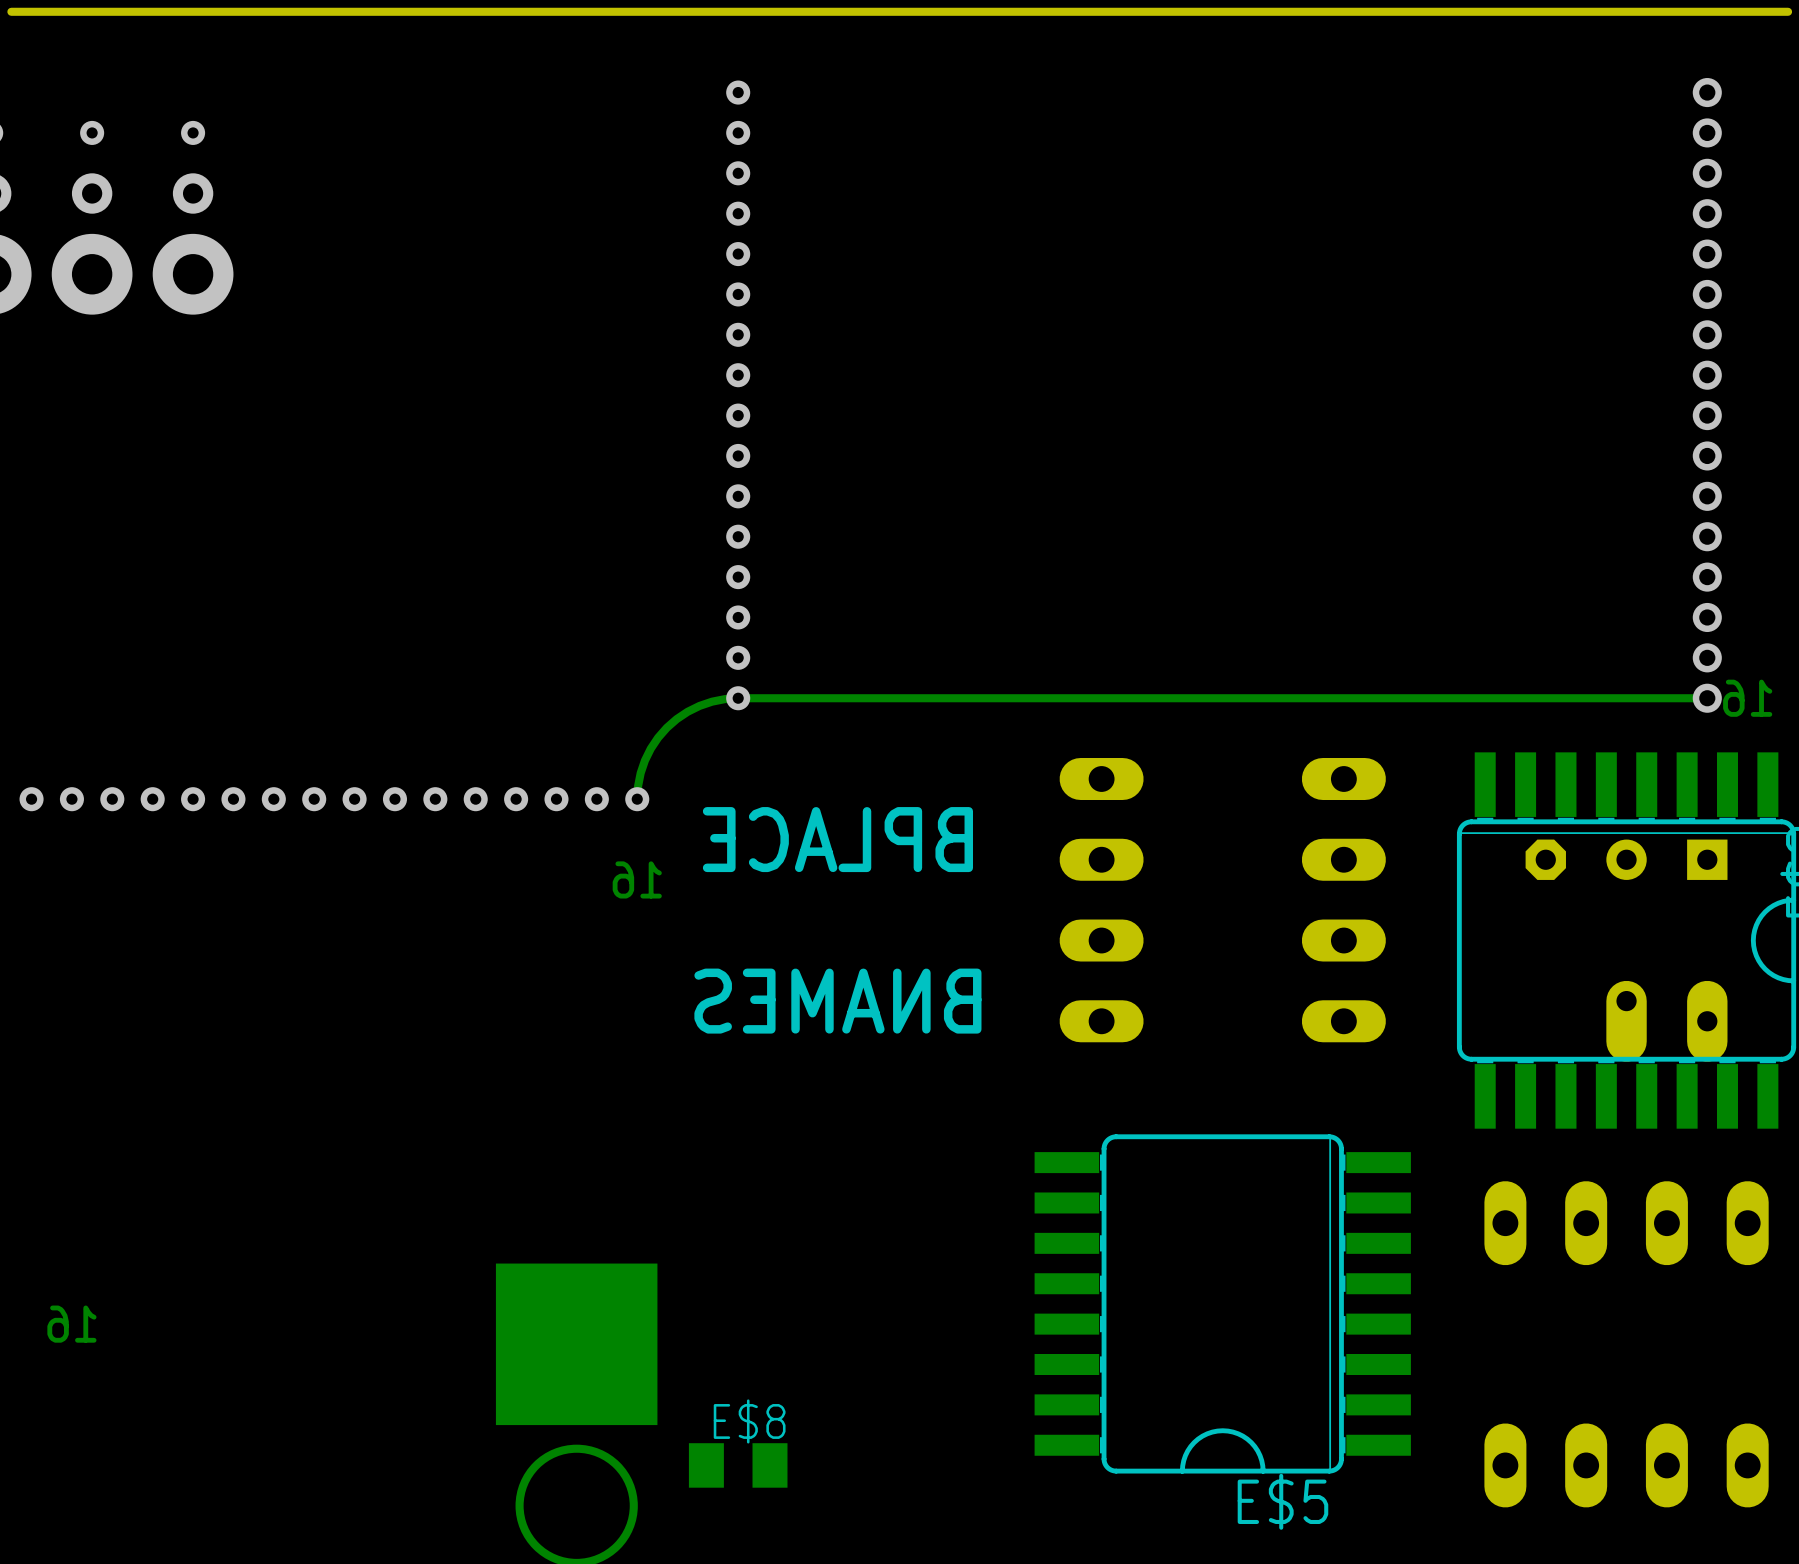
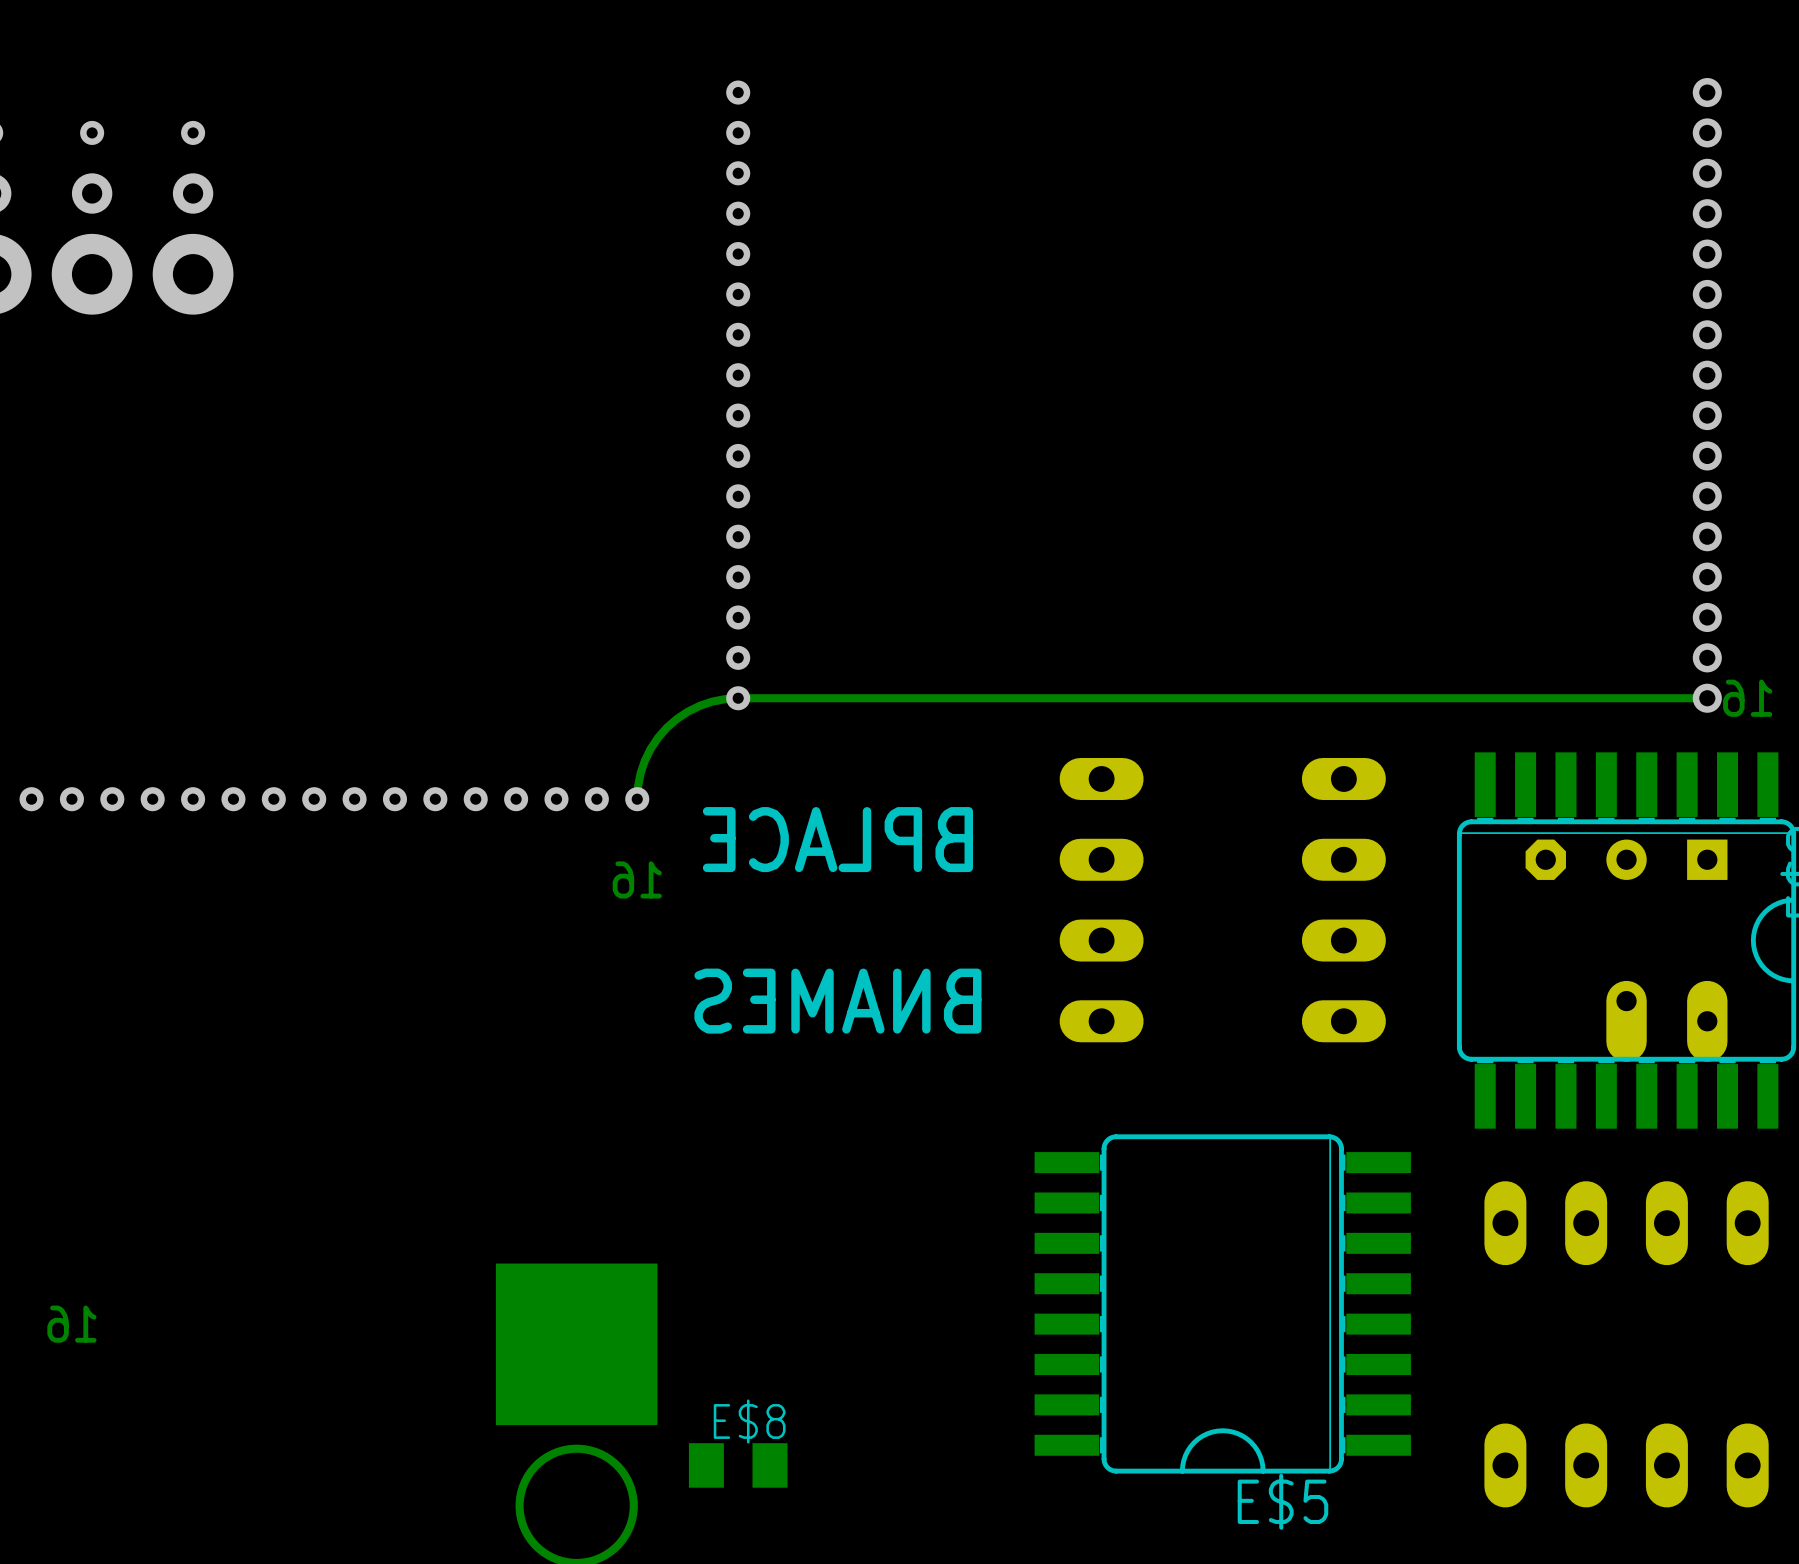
board edge: (1788, 11) (11, 11) -> none

